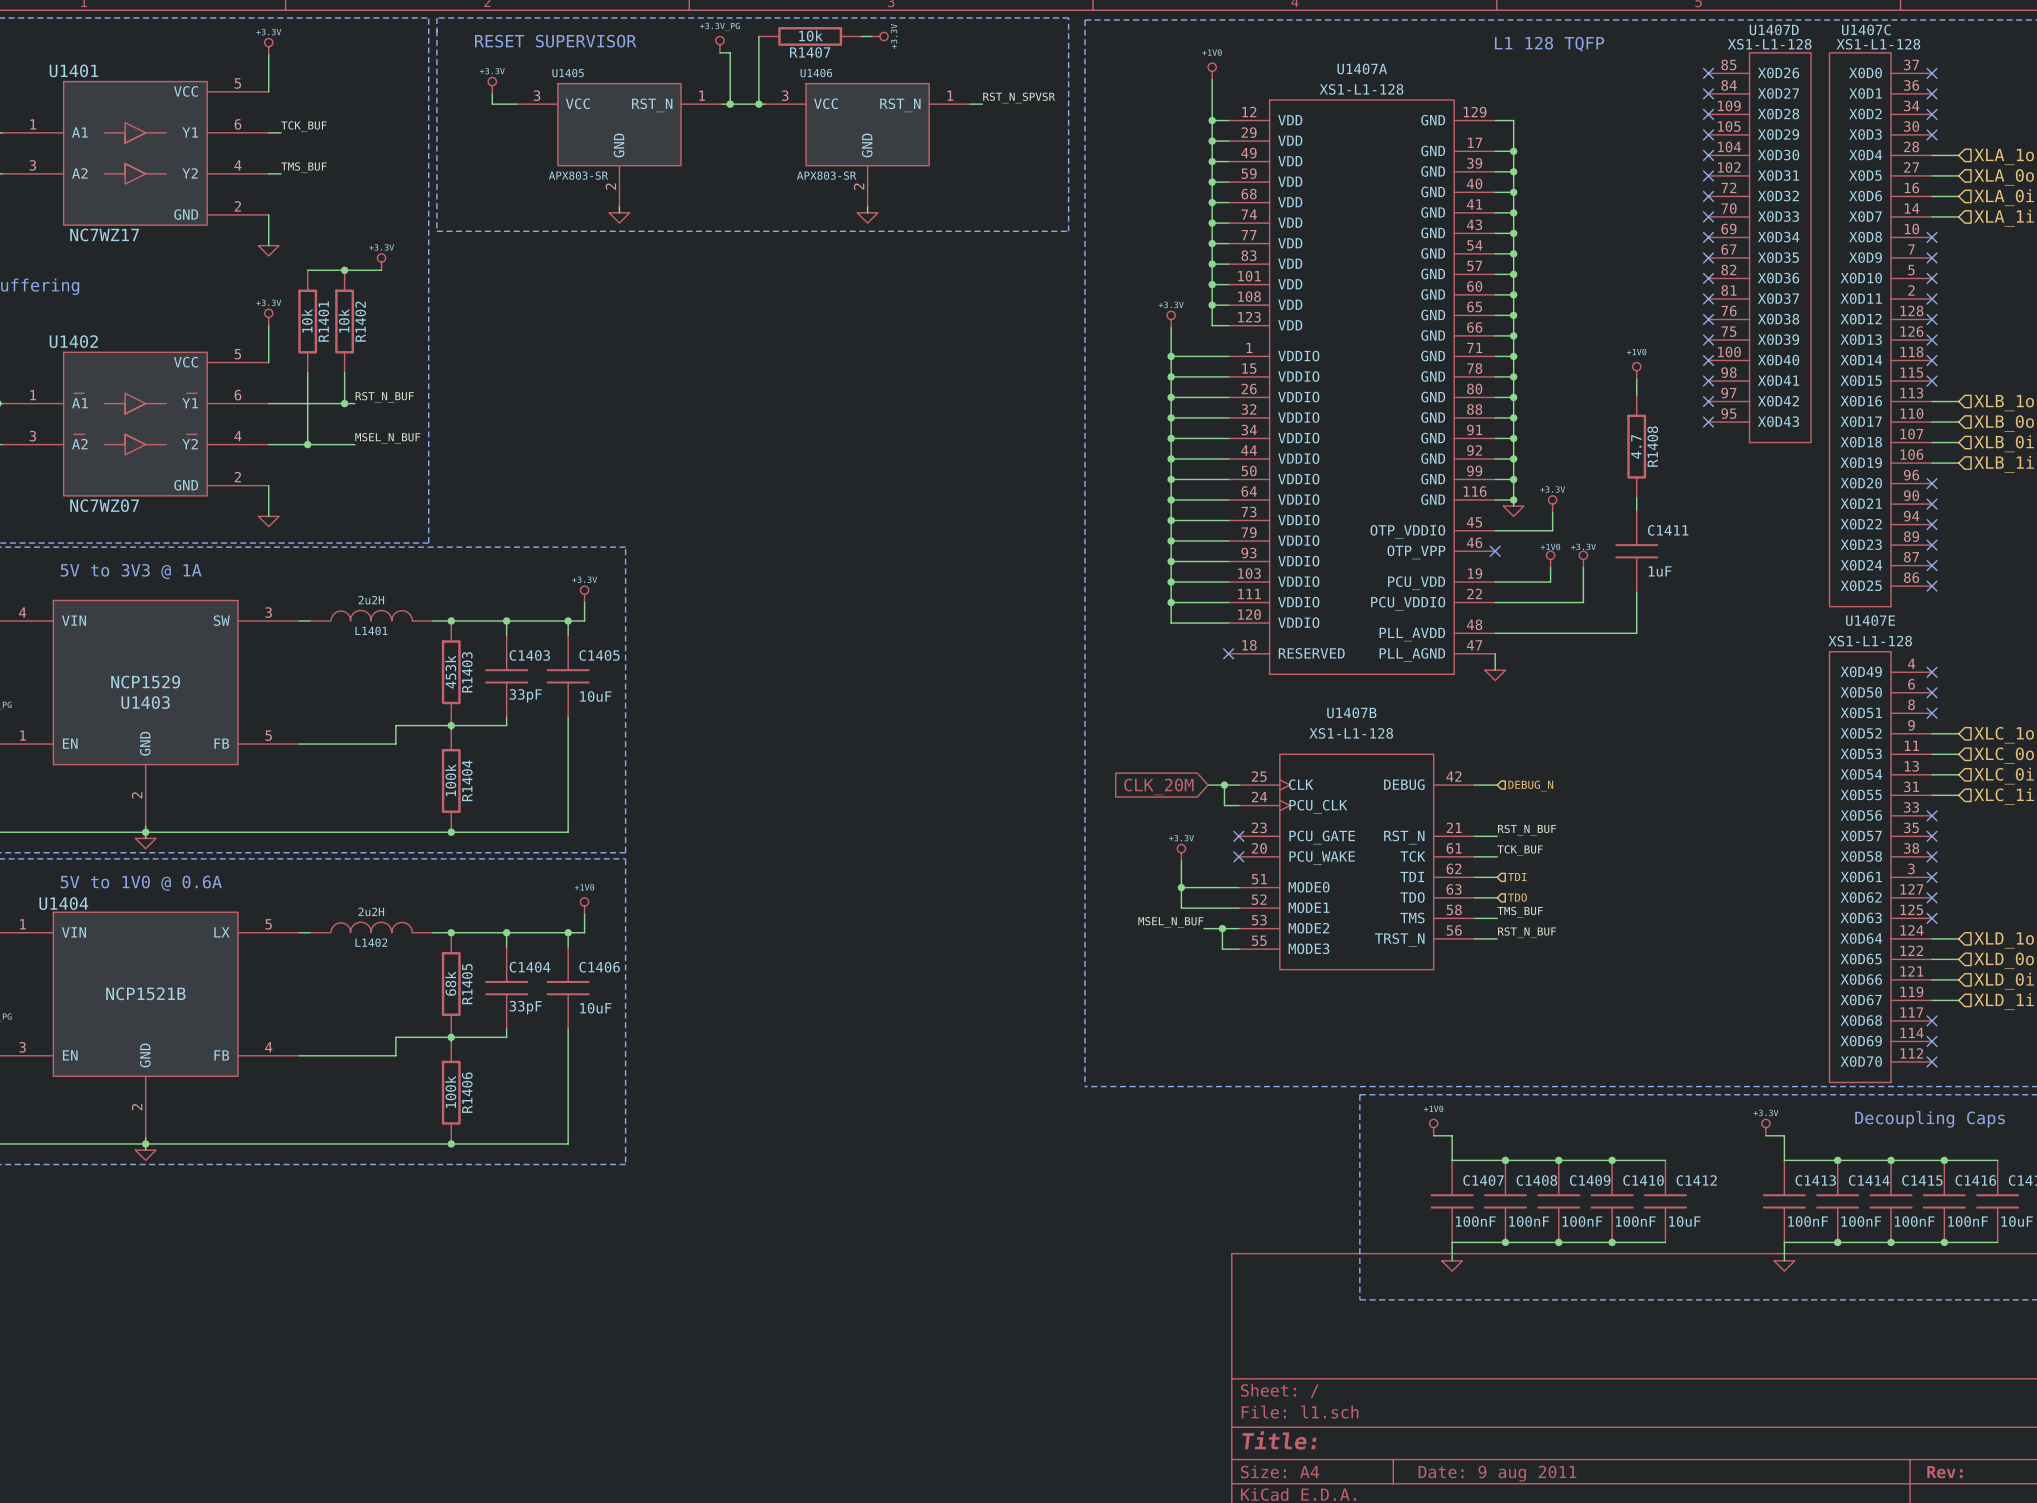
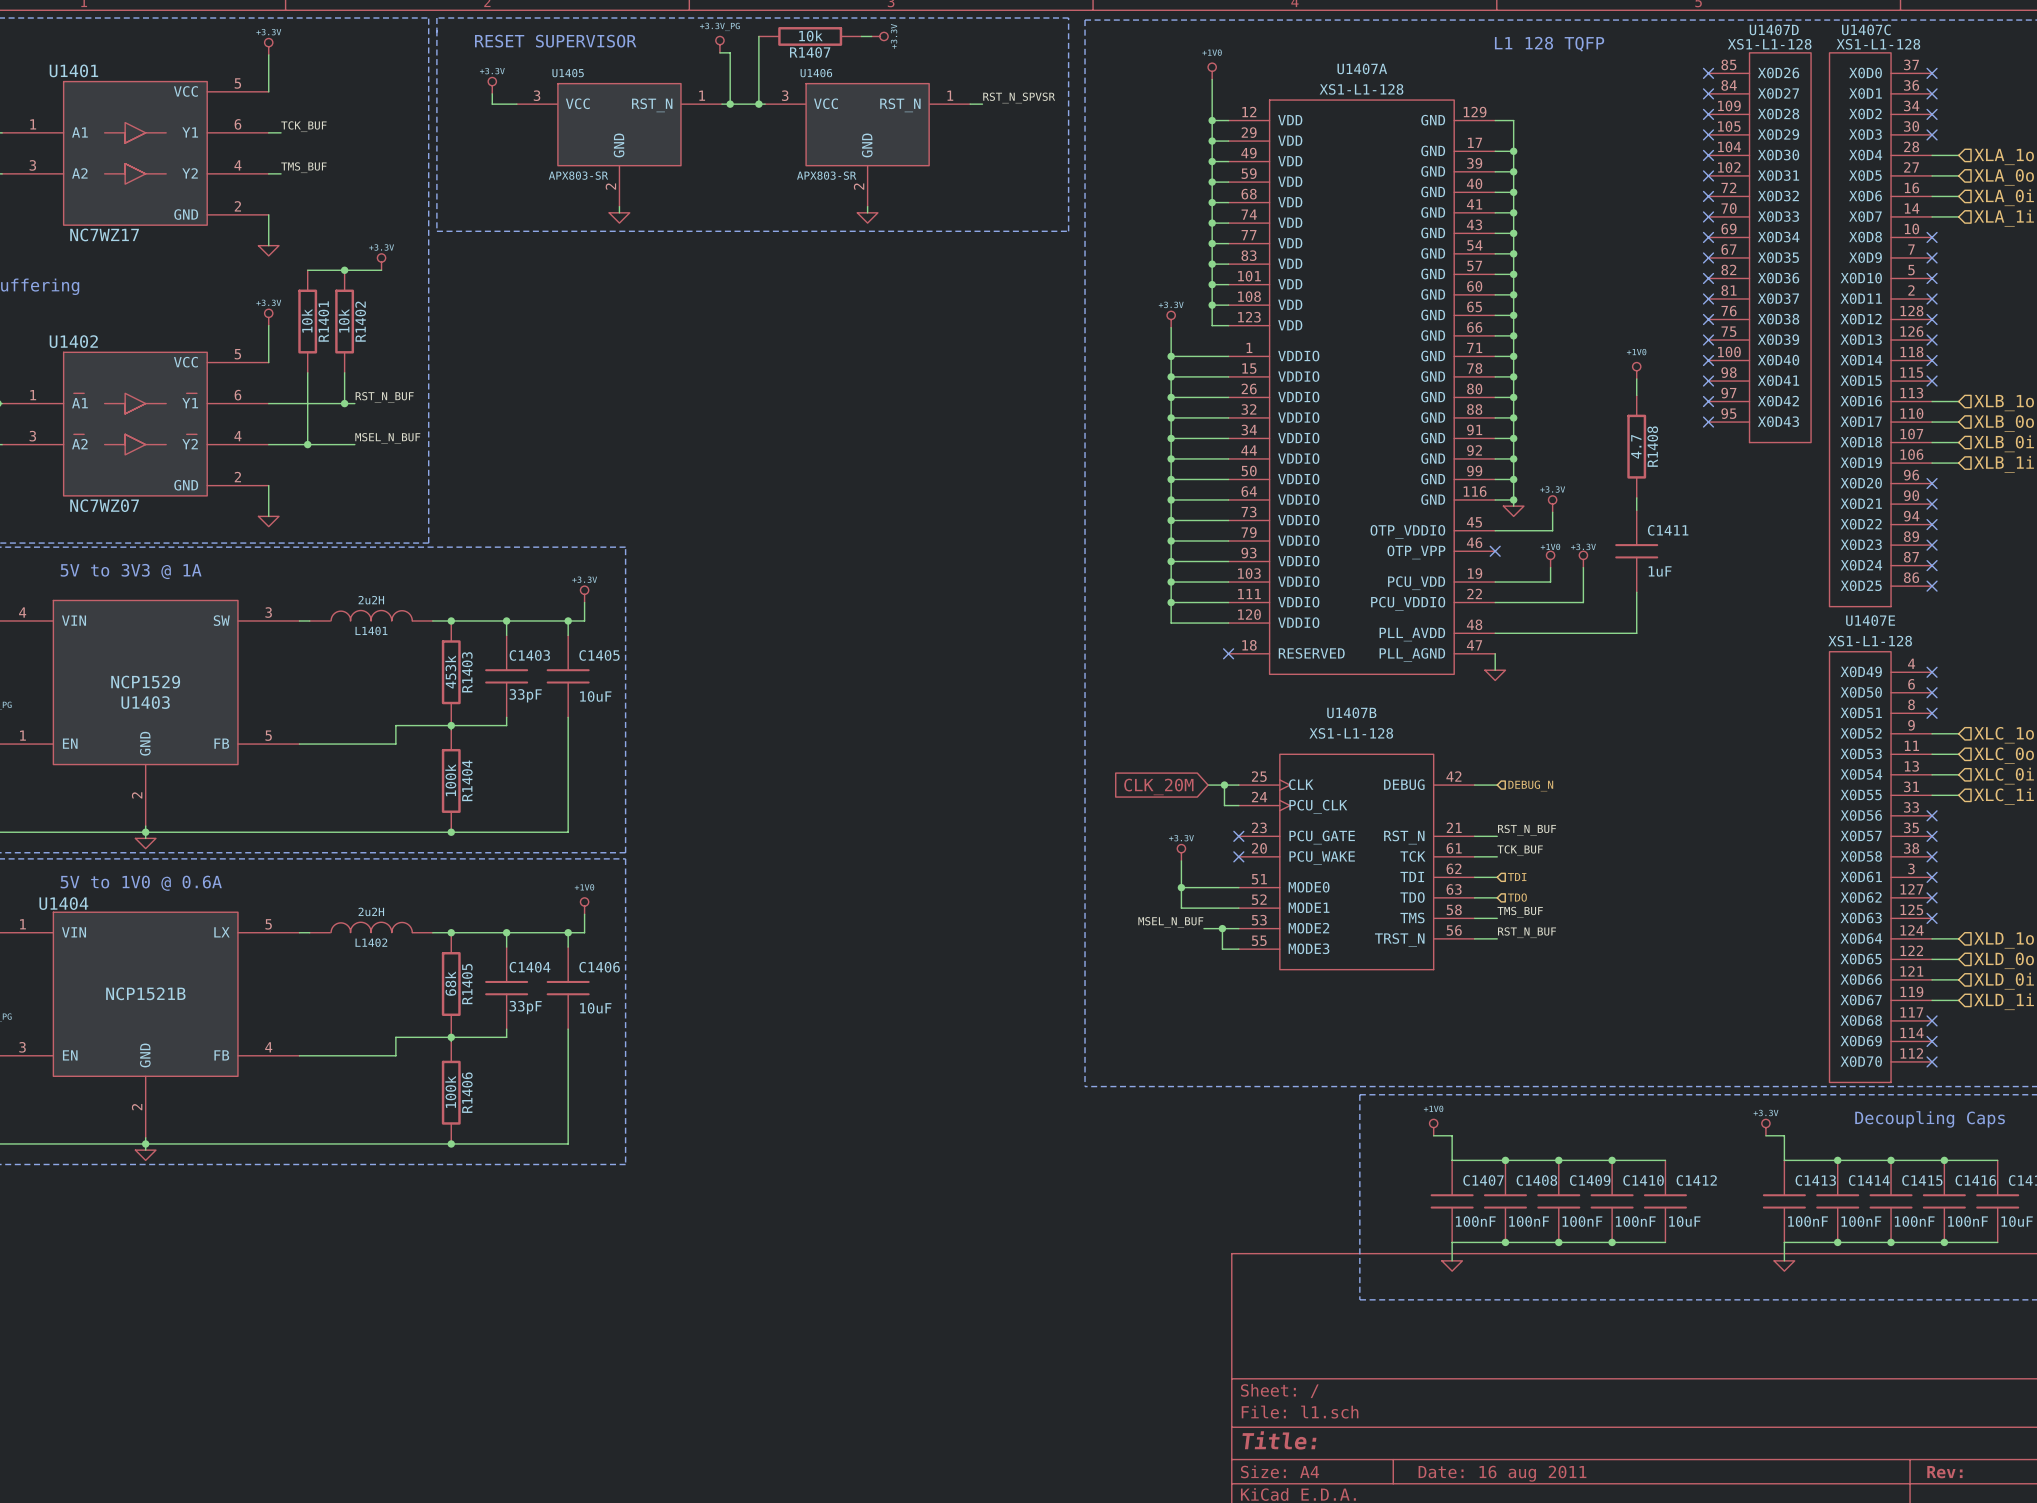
title block: Date: 9 aug 2011 (1497, 1473) -> Date: 16 aug 2011 (1502, 1473)

